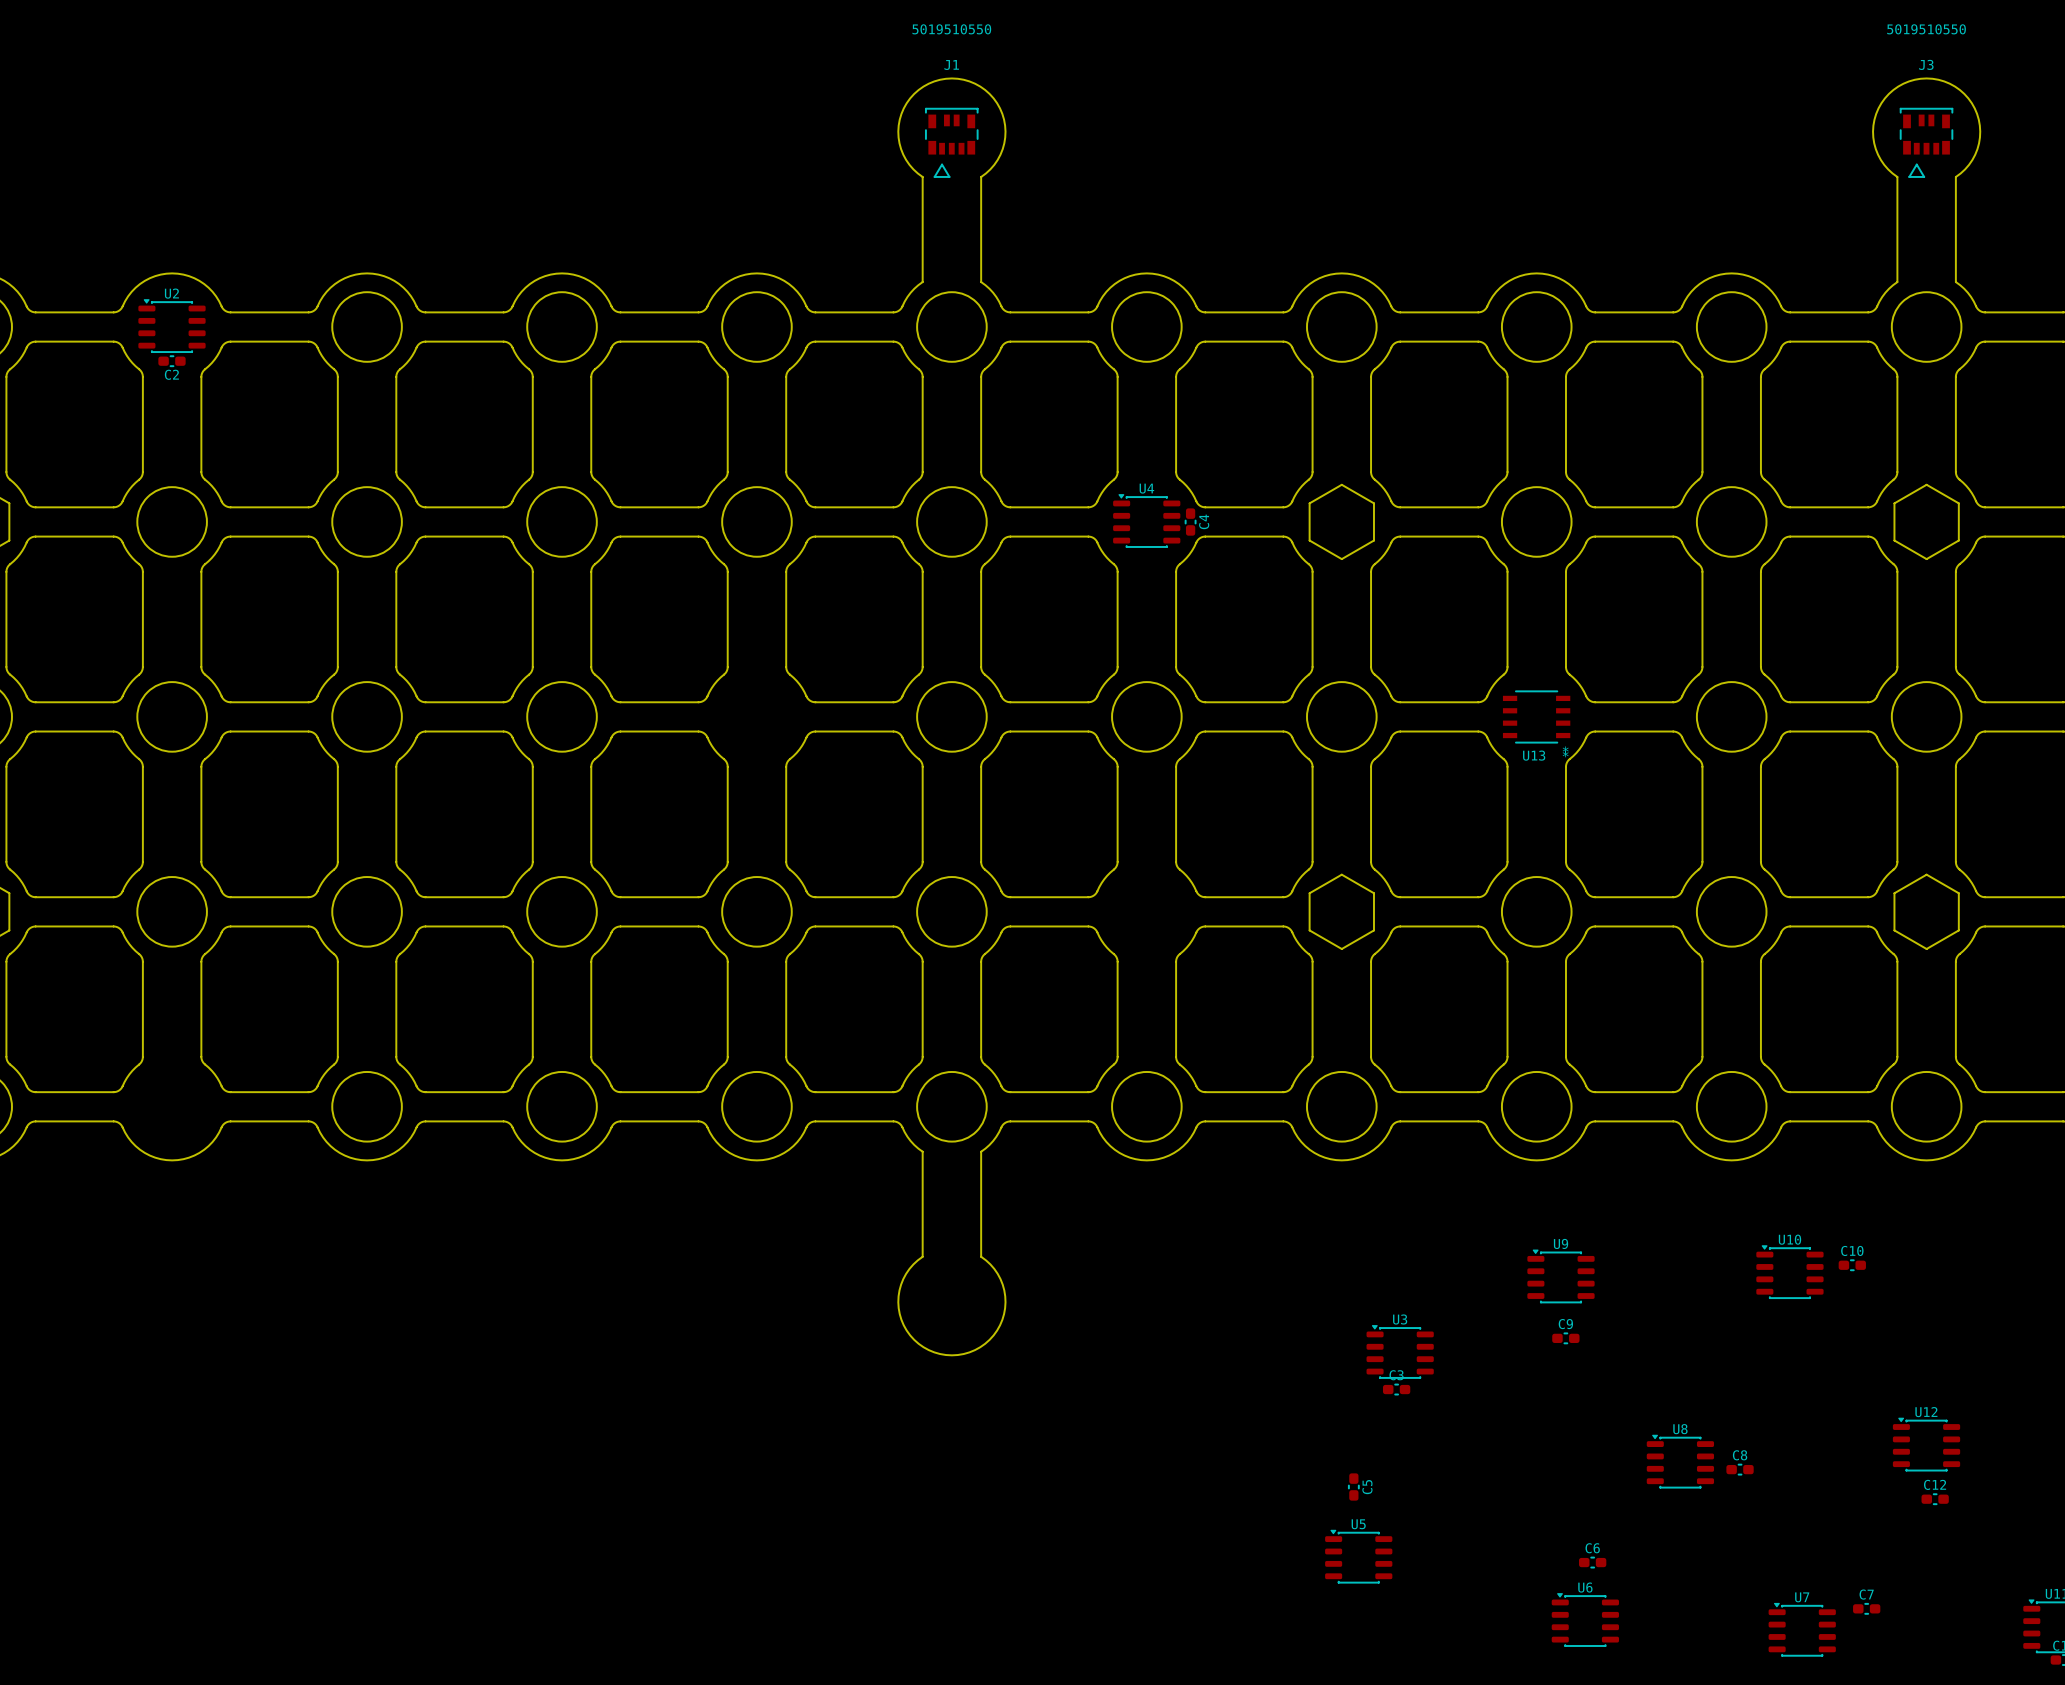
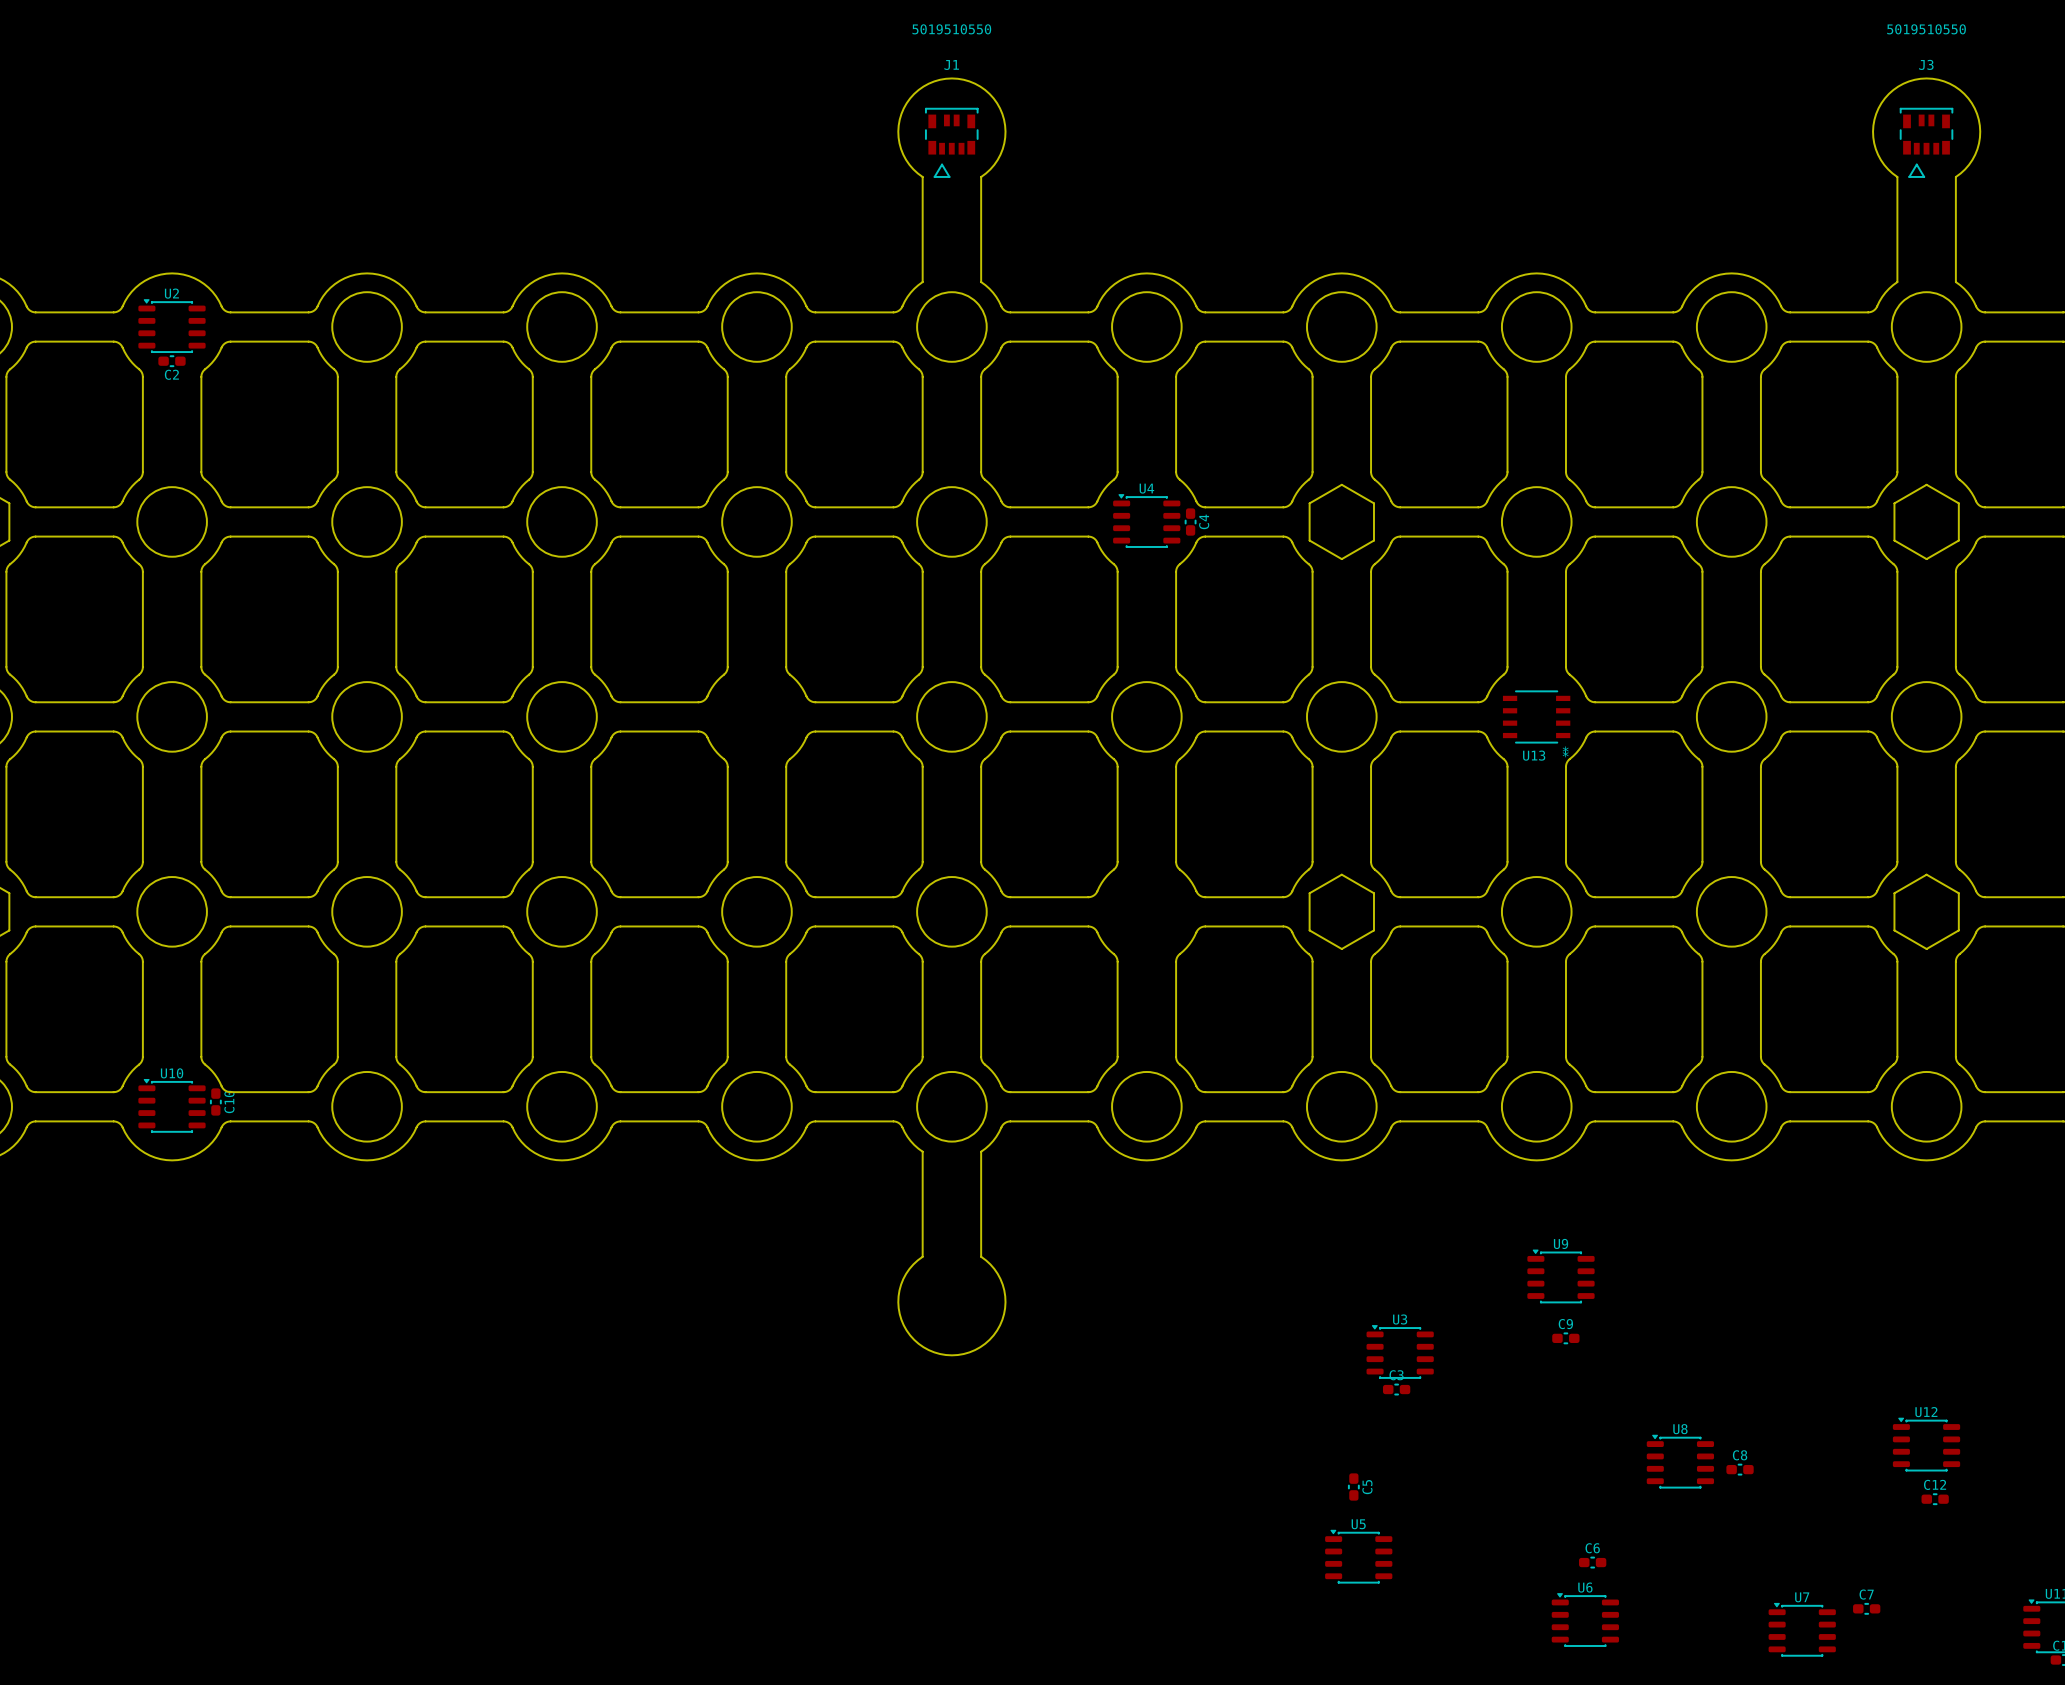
C10 rotation: 0° (1852, 1265) -> 90° clockwise (215, 1101)
C10 position: (1852, 1265) -> (215, 1101)
U10 position: (1789, 1271) -> (172, 1105)

